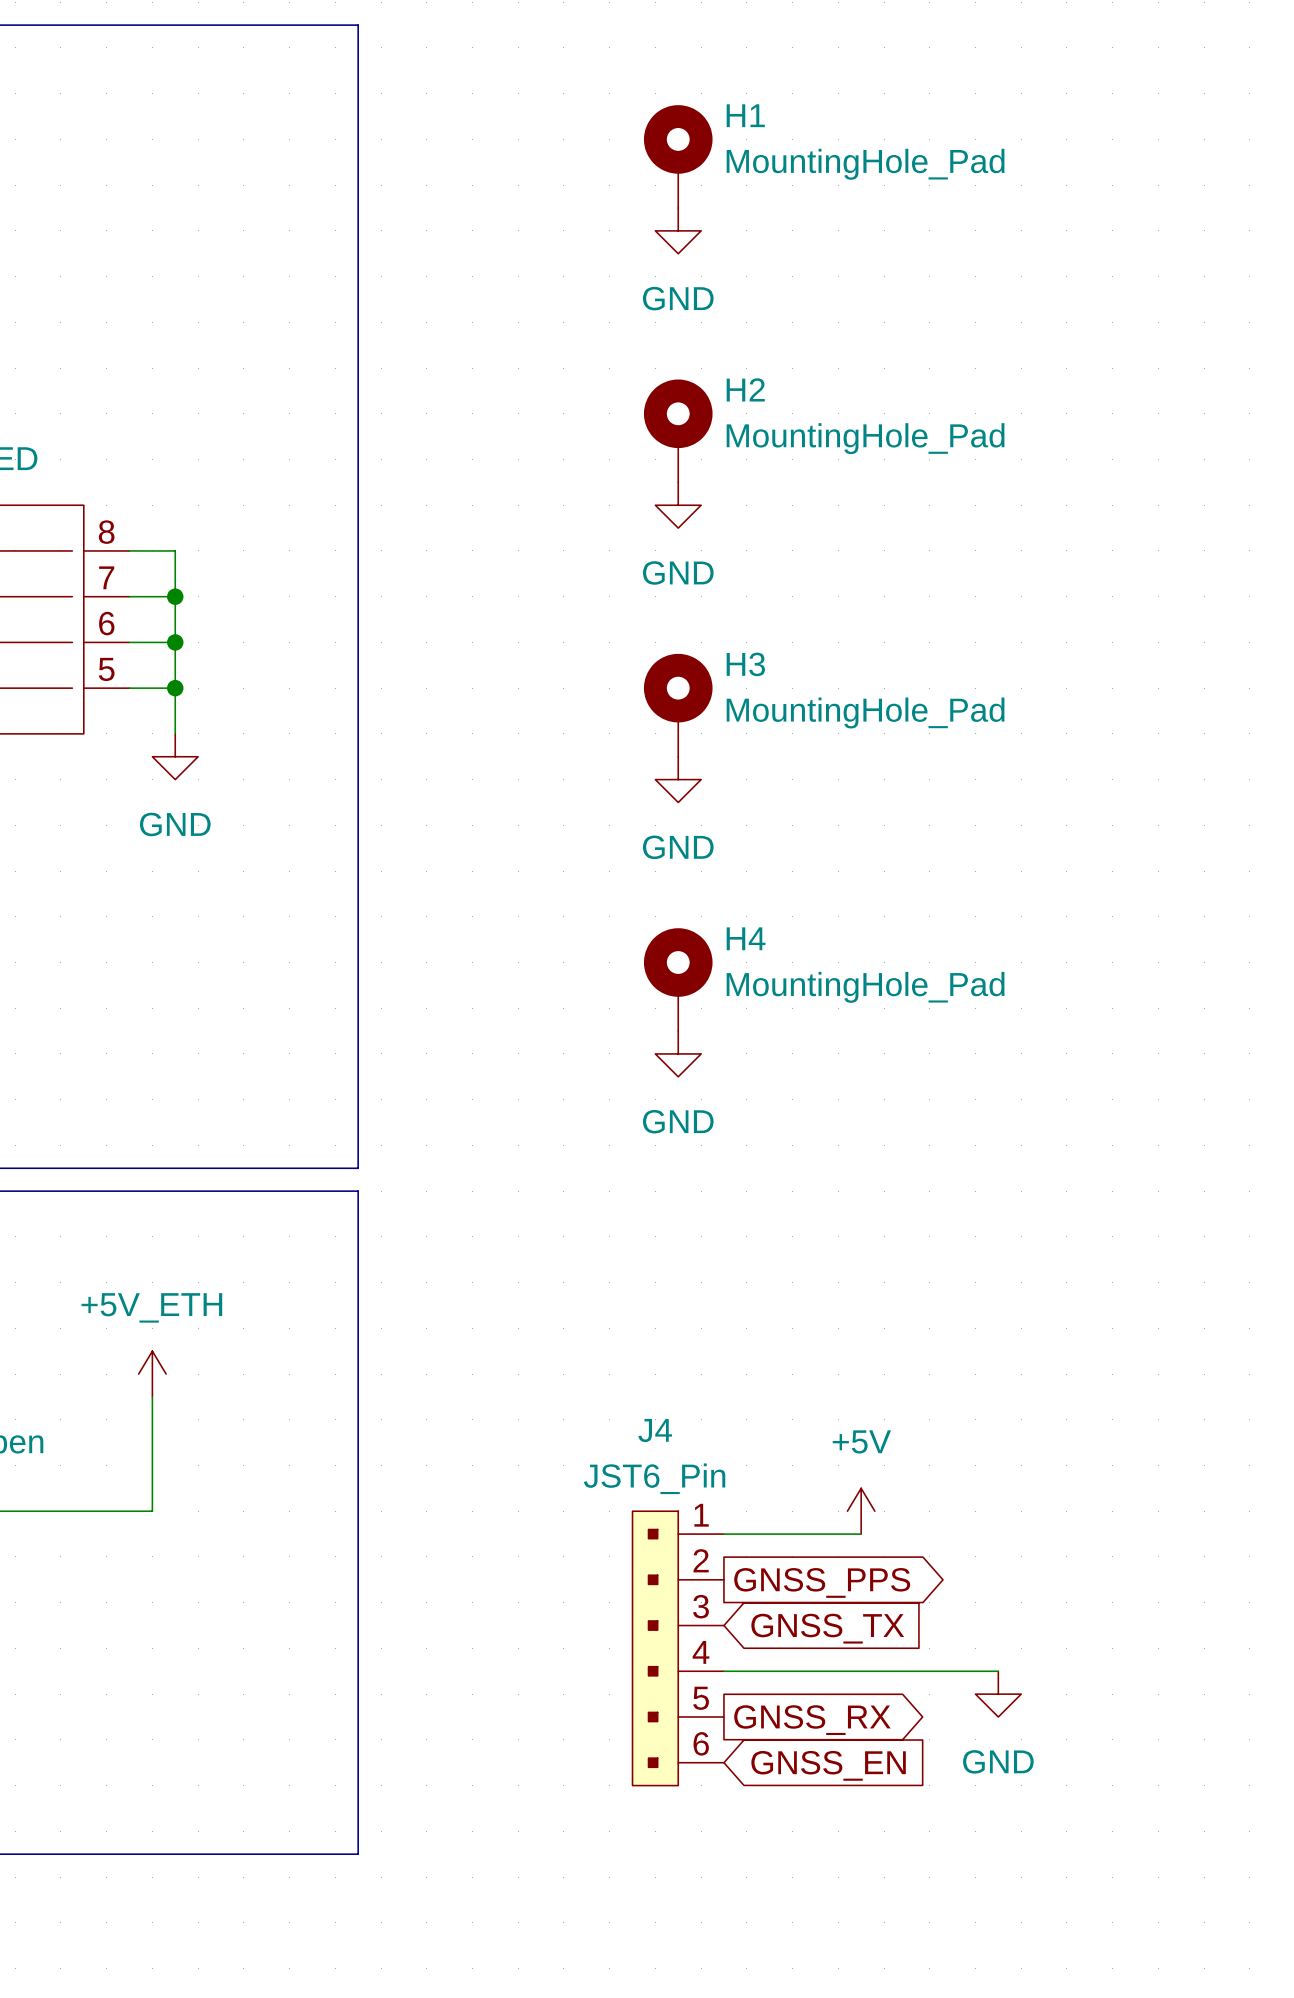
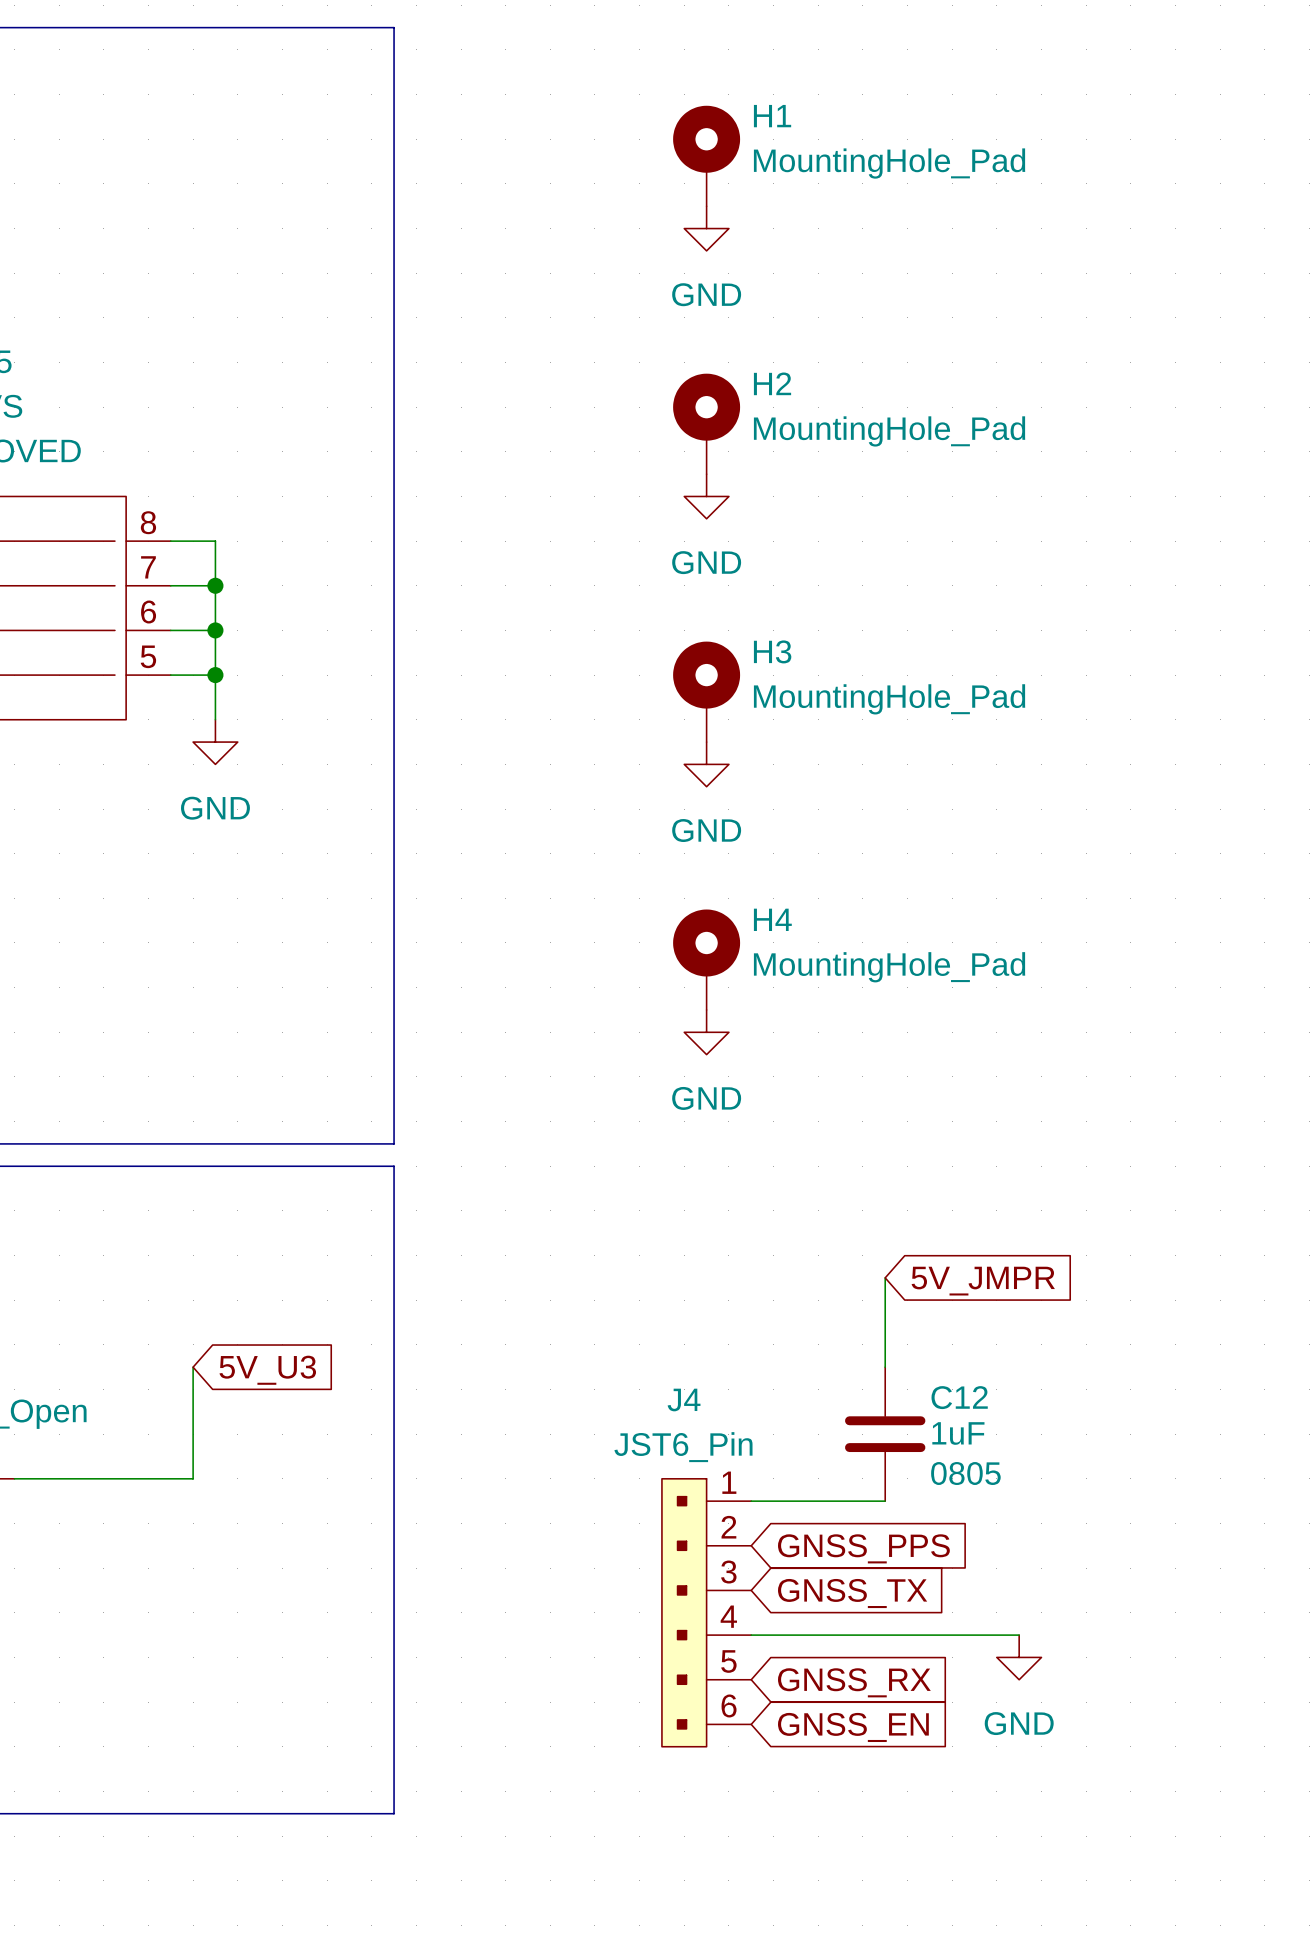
wire: none -> (885, 1277) (885, 1367)
global label: none -> 5V_JMPR (983, 1281)
power symbol: +5V_ETH (152, 1374) -> none
global label: none -> 5V_U3 (267, 1370)
C12: none -> 1uF (885, 1434)
power symbol: +5V (861, 1511) -> none
global label shape: output (822, 1582) -> input (863, 1548)
global label shape: output (812, 1720) -> input (854, 1682)

